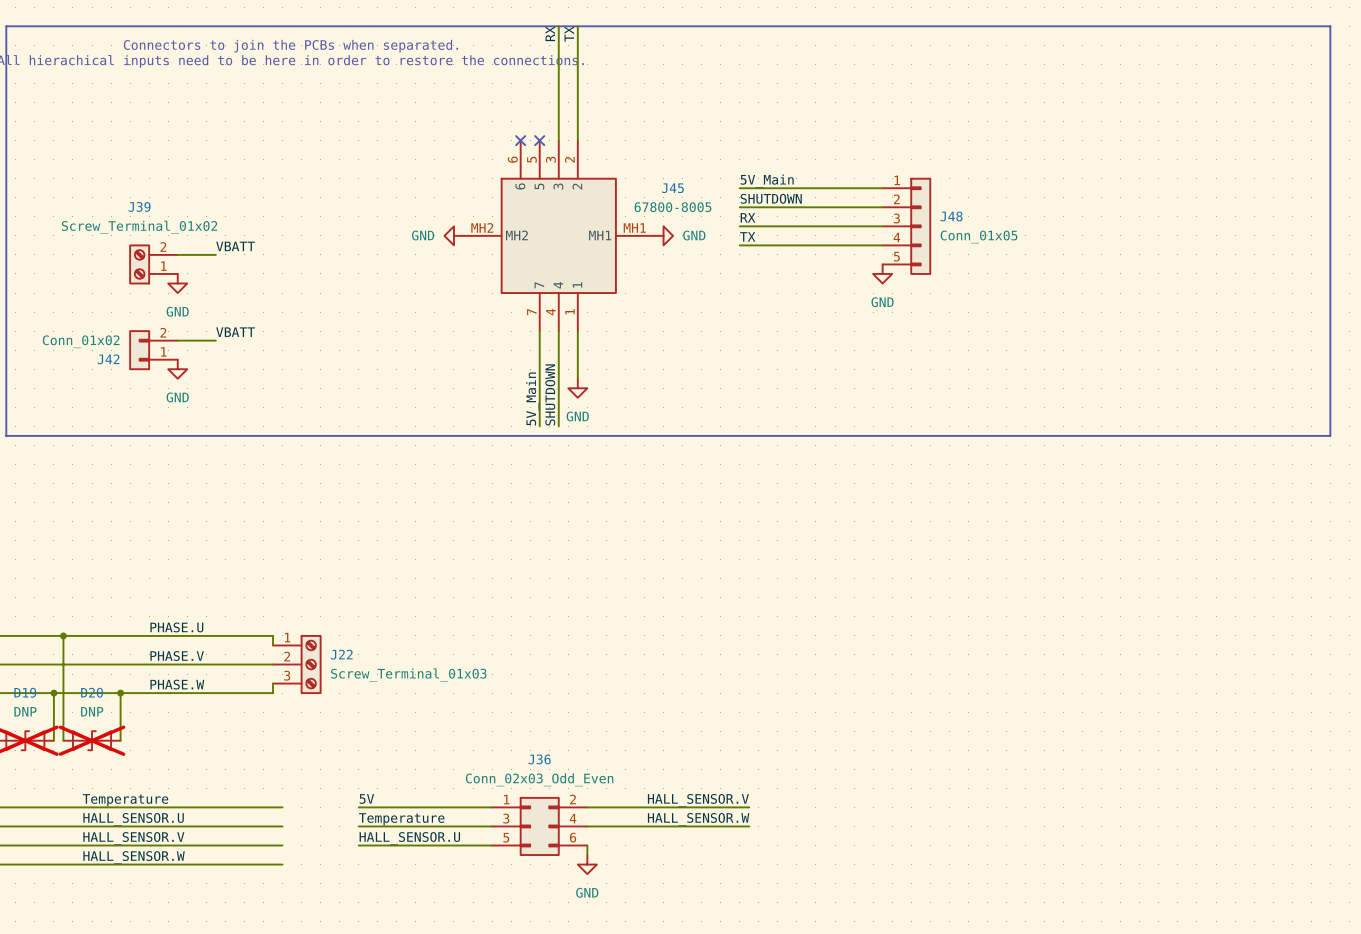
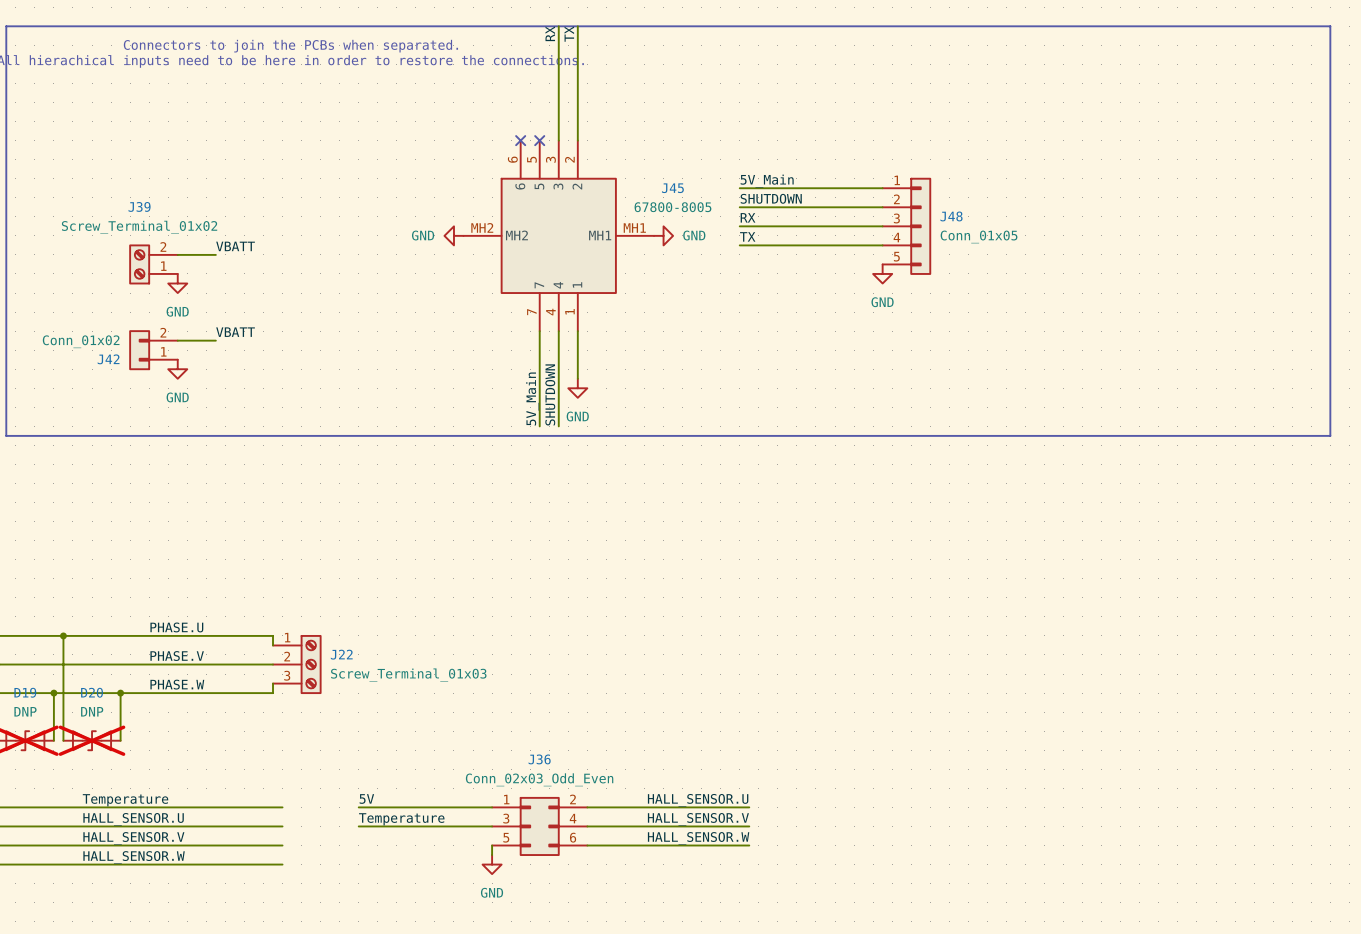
label: HALL_SENSOR.V (698, 800) -> HALL_SENSOR.U (698, 800)
label: HALL_SENSOR.W (698, 819) -> HALL_SENSOR.V (698, 819)
label: HALL_SENSOR.U (409, 838) -> none
label: none -> HALL_SENSOR.W (698, 838)
wire: (358, 845) (492, 845) -> (492, 855) (492, 845)
wire: (587, 845) (587, 855) -> (587, 845) (749, 845)
power symbol position: GND (587, 864) -> GND (492, 864)

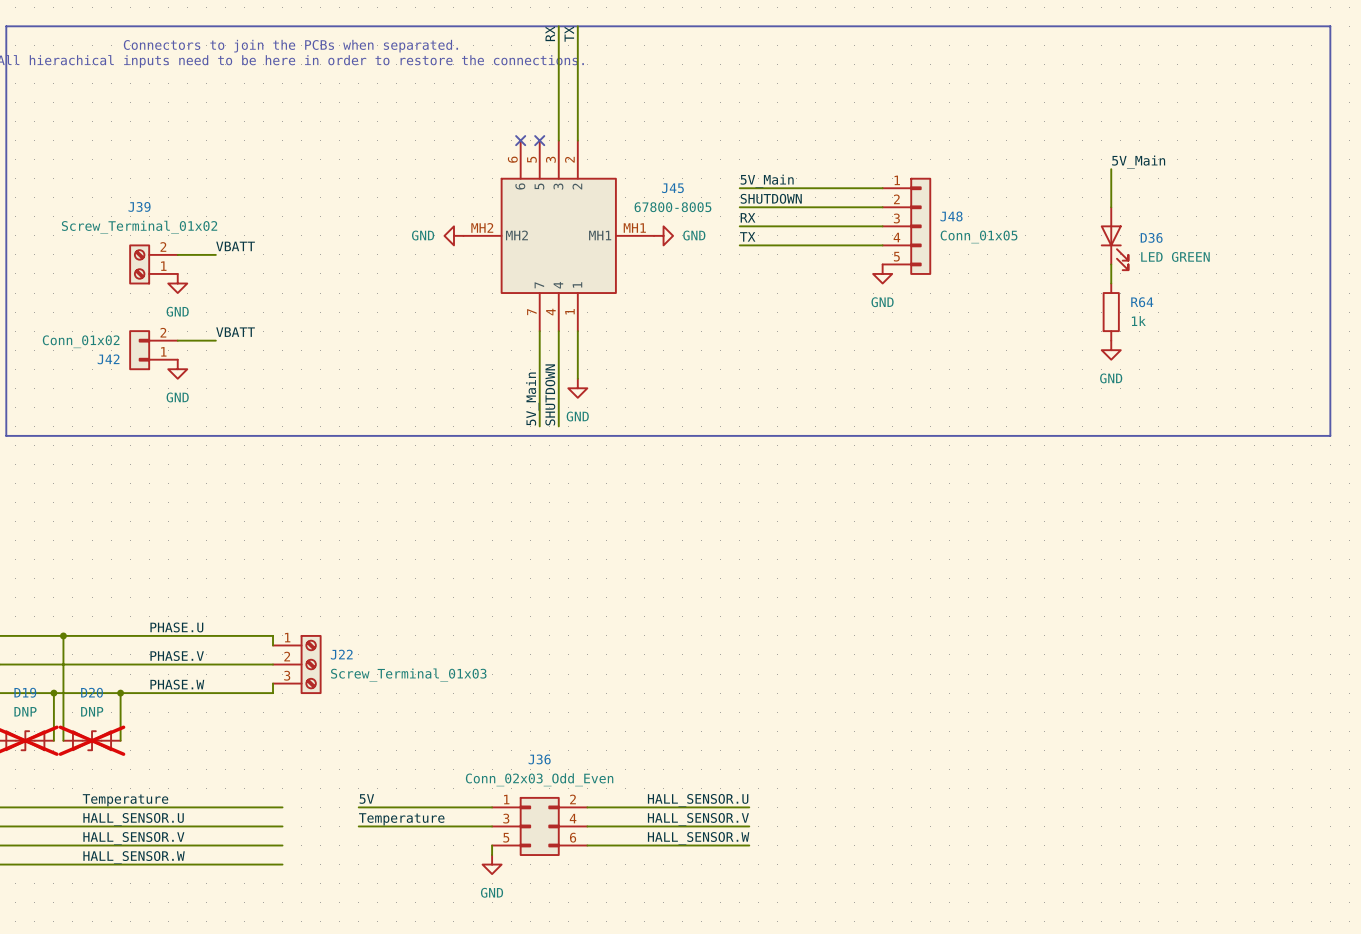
label: none -> 5V_Main (1138, 162)
wire: none -> (1111, 169) (1111, 207)
D36: none -> LED GREEN (1114, 238)
wire: none -> (1111, 264) (1111, 283)
R64: none -> 1k (1111, 312)
power symbol: none -> GND (1111, 350)

